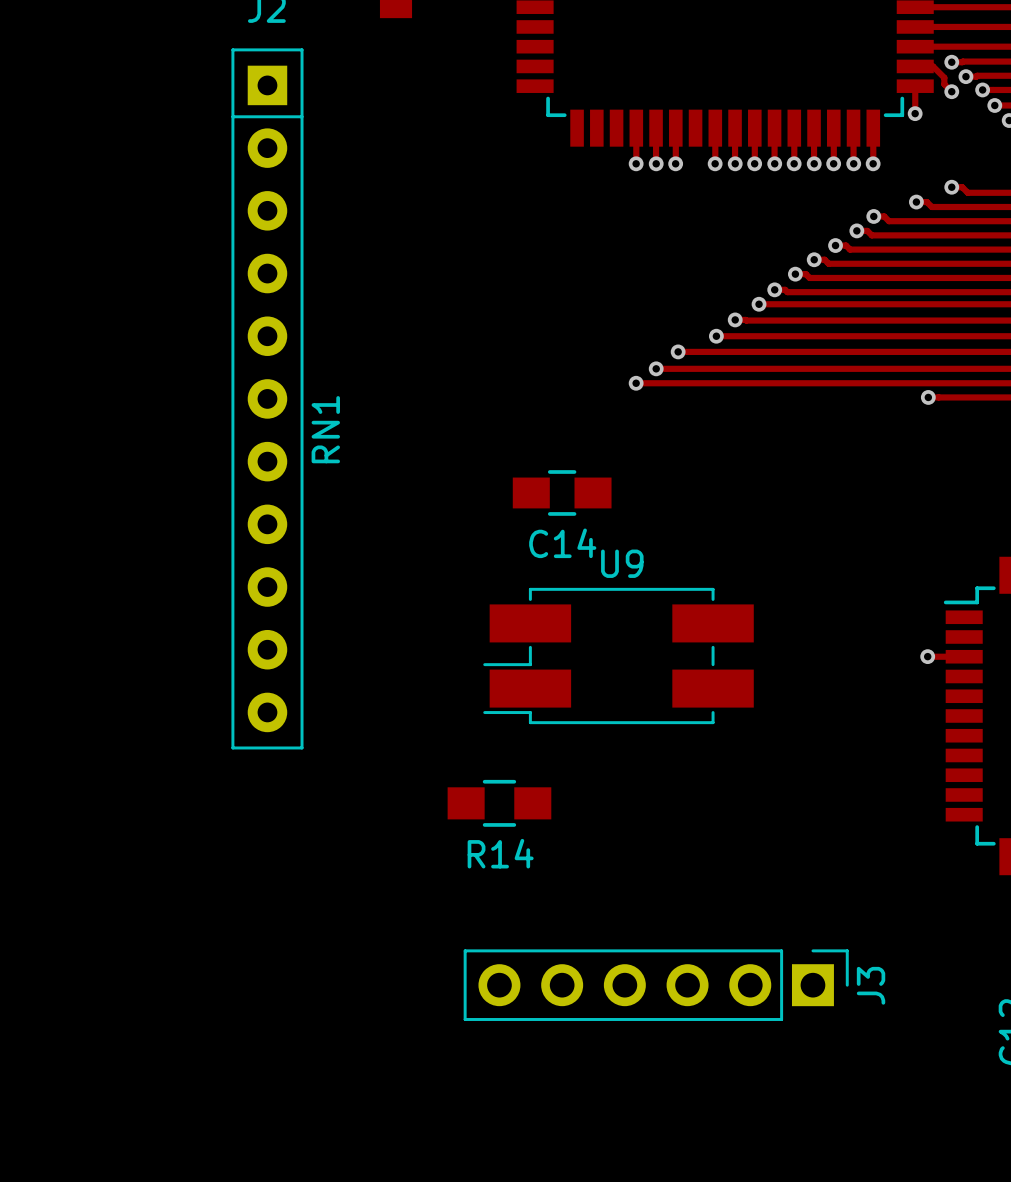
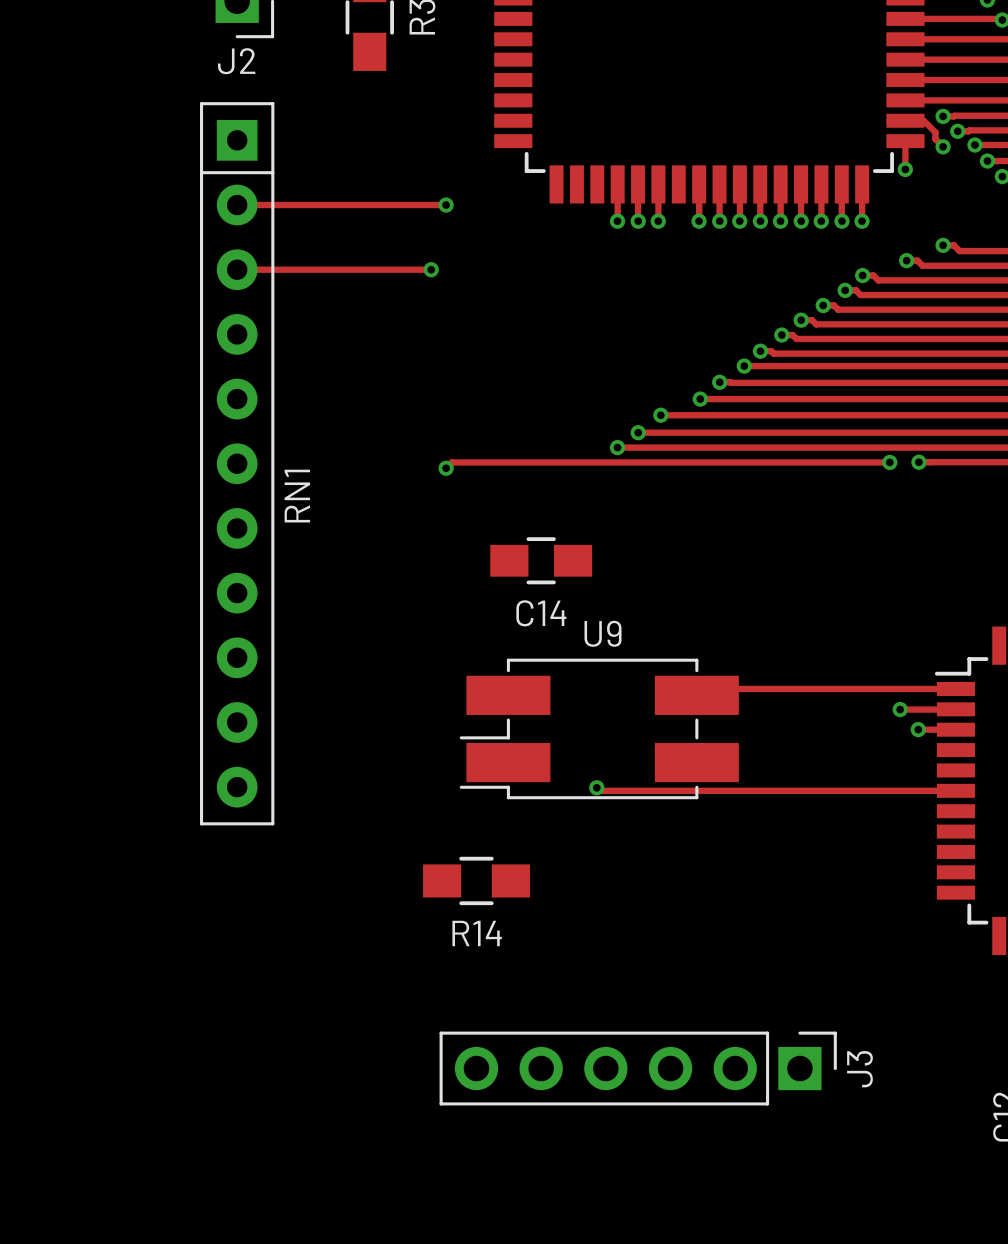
track: none -> (237, 205) (446, 205)
via: none -> (446, 205)
track: none -> (237, 269) (431, 269)
via: none -> (431, 269)
track: none -> (889, 462) (451, 462) (446, 468)
via: none -> (889, 462)
via: none -> (446, 468)
track: none -> (955, 688) (703, 688) (696, 695)
track: none -> (900, 709) (955, 709)
via: none -> (900, 709)
track: none -> (596, 787) (599, 790) (955, 790)
via: none -> (596, 787)

